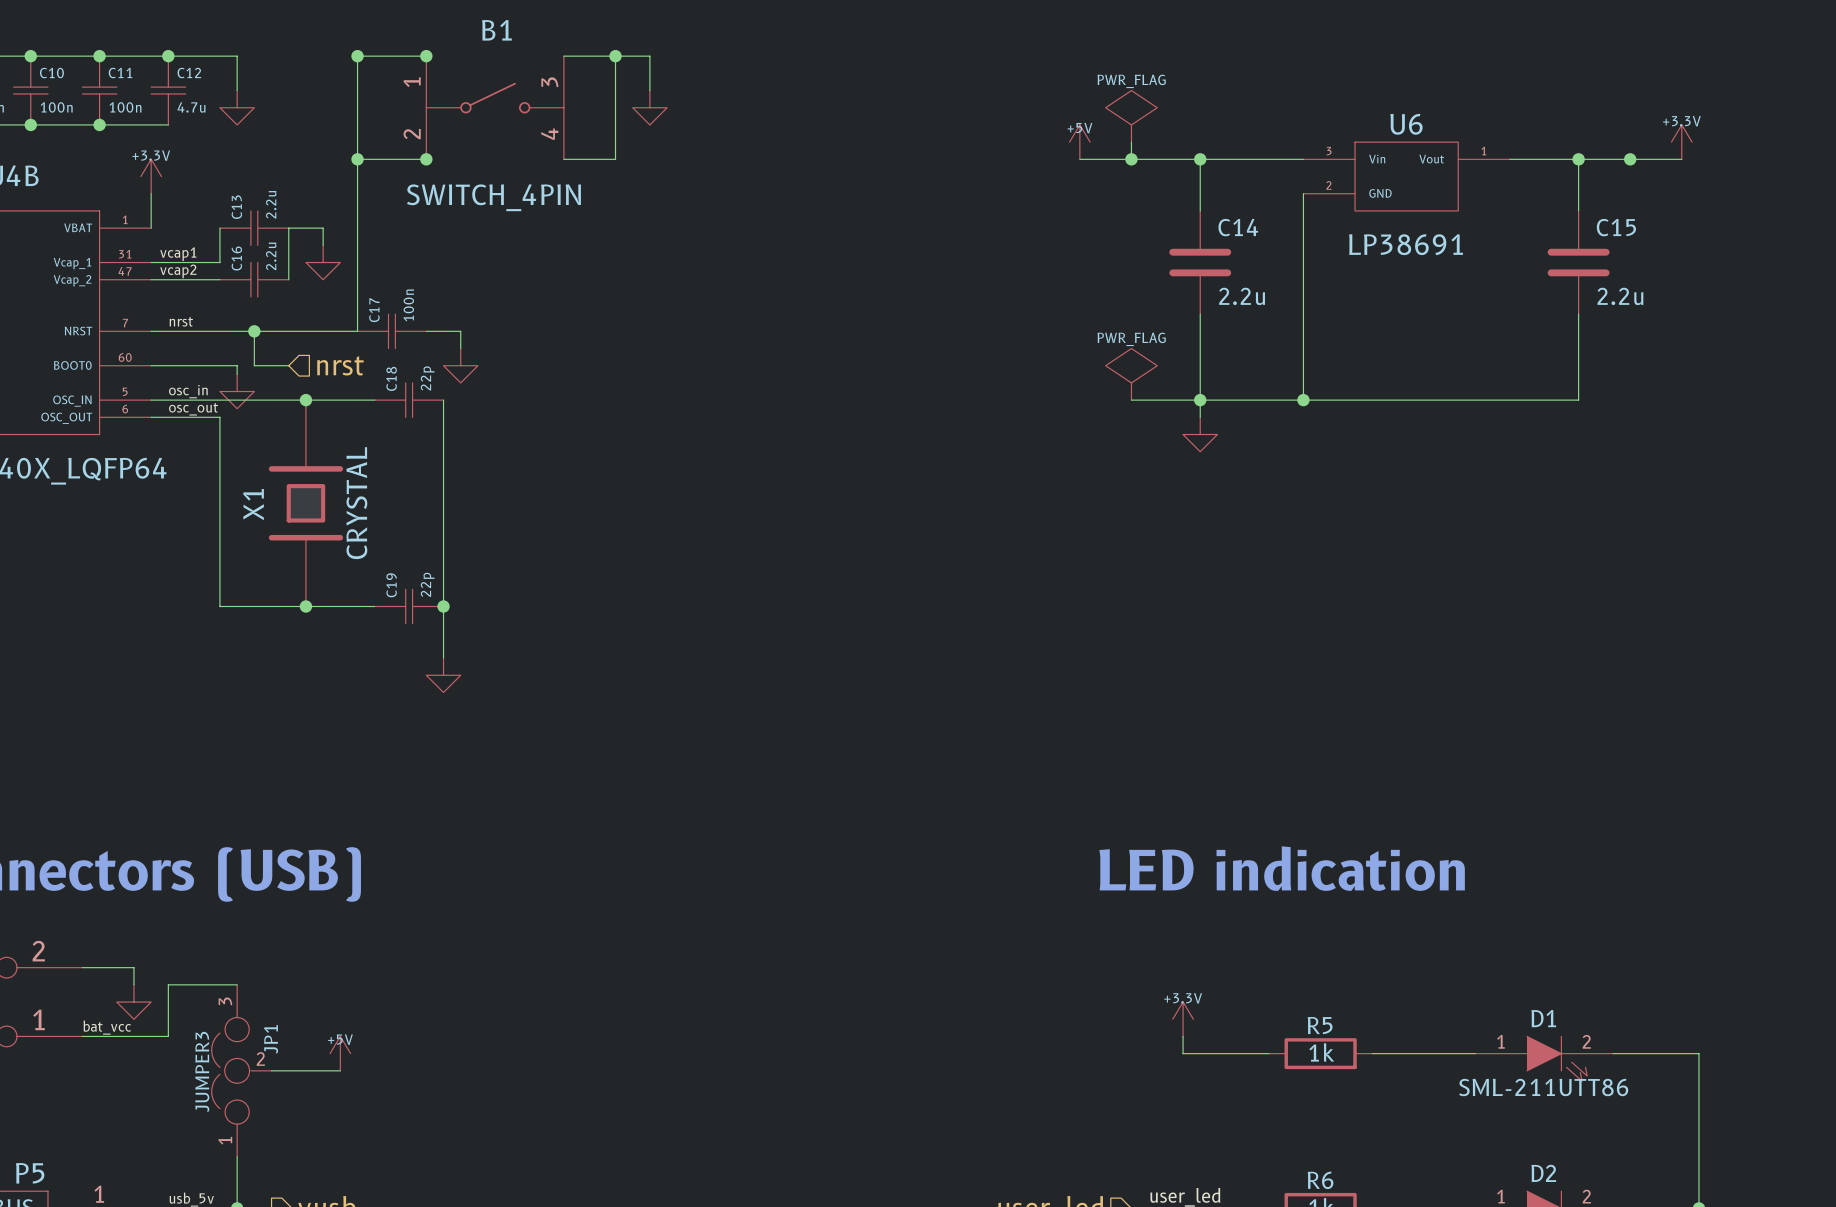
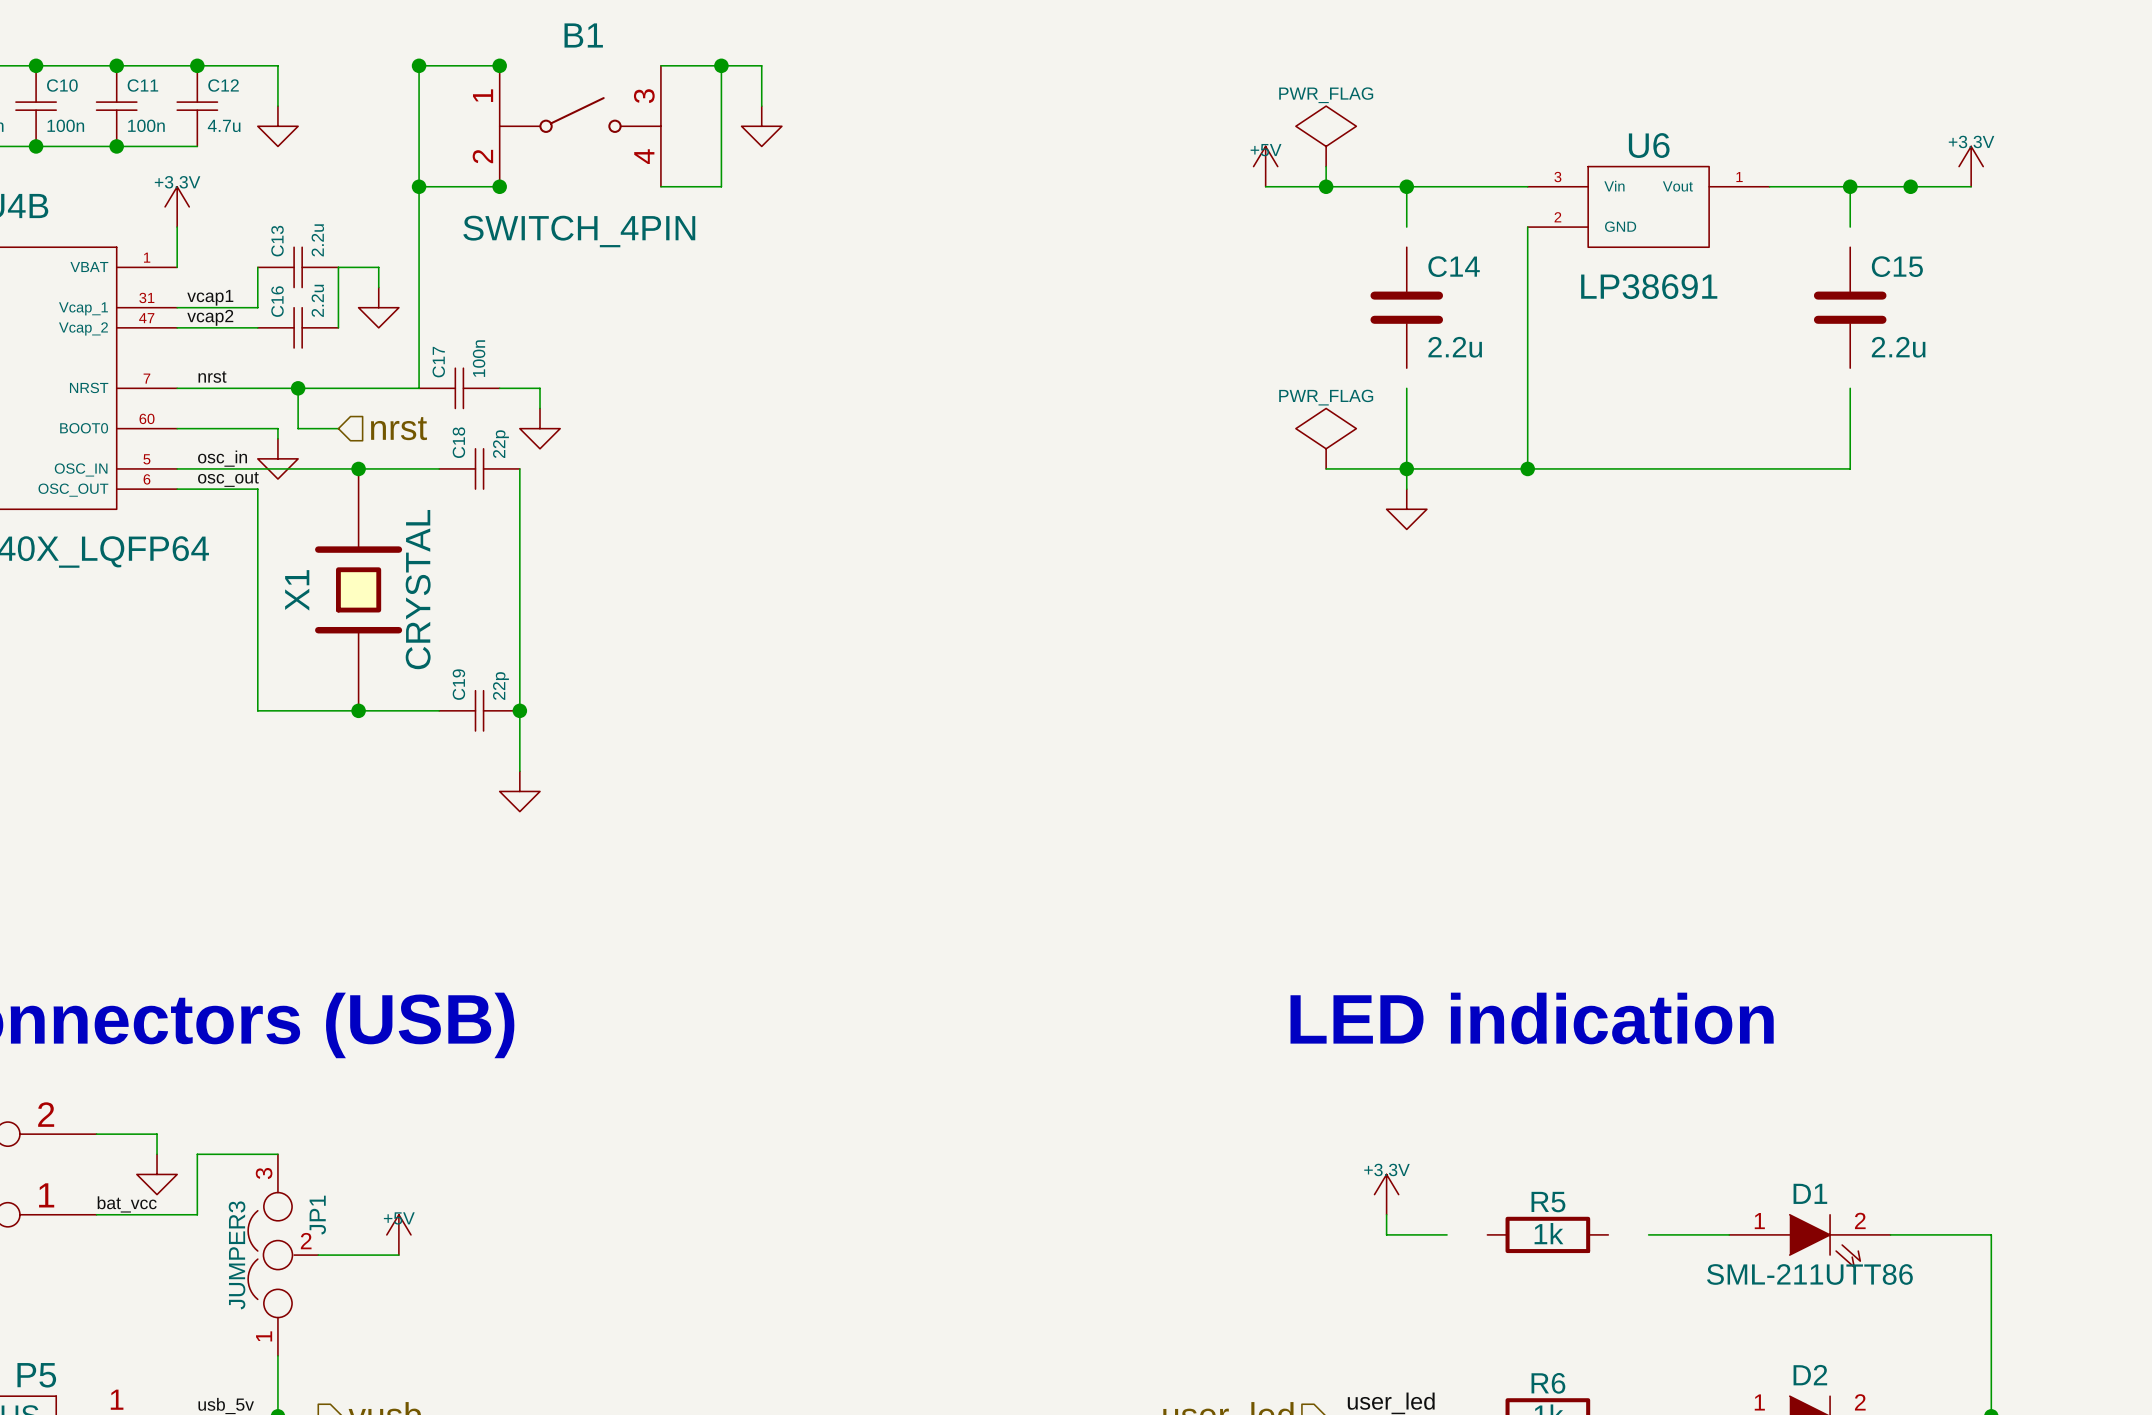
wire: (1200, 193) (1200, 210) -> none
wire: (1578, 193) (1578, 210) -> none
wire: (1200, 314) (1200, 331) -> none
wire: (1578, 314) (1578, 331) -> none
wire: (1234, 1053) (1269, 1053) -> none
wire: (1372, 1053) (1406, 1053) -> none

